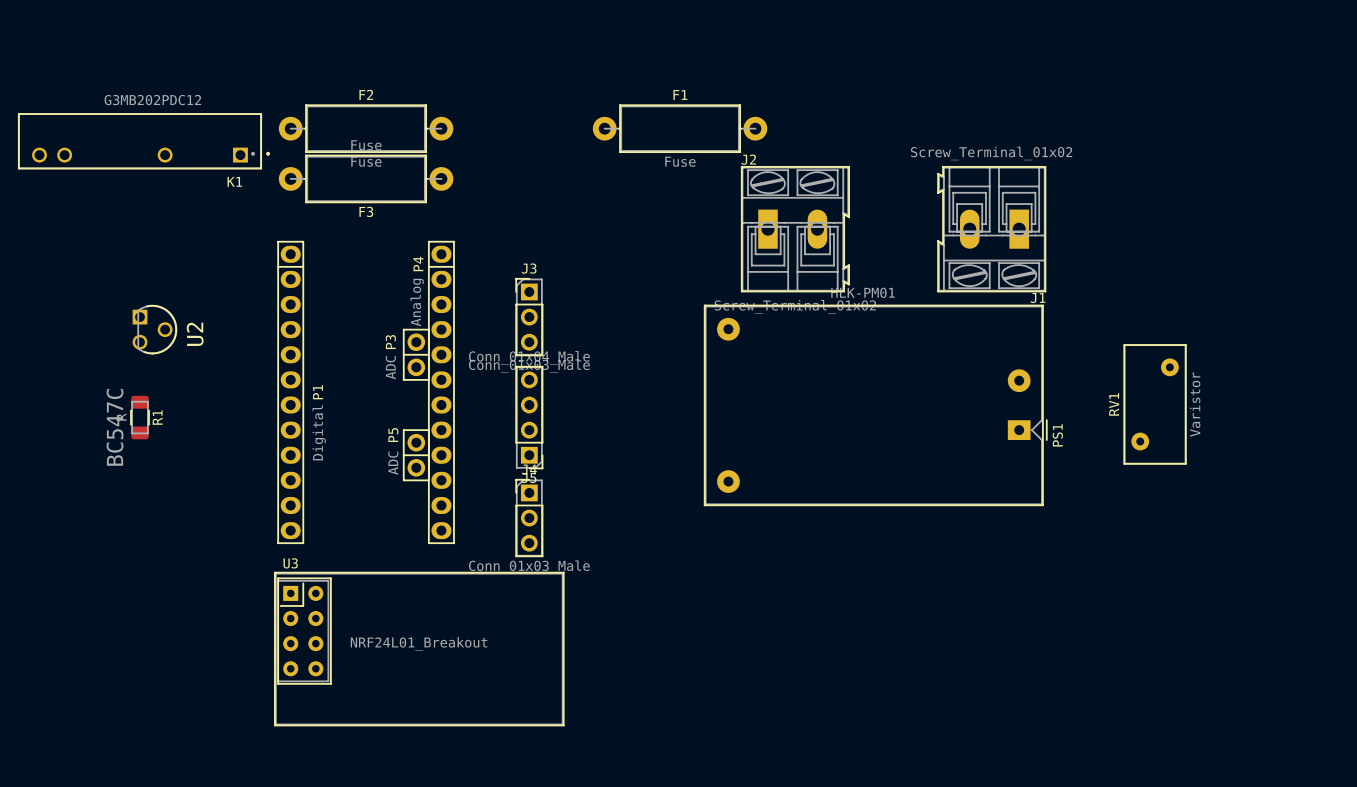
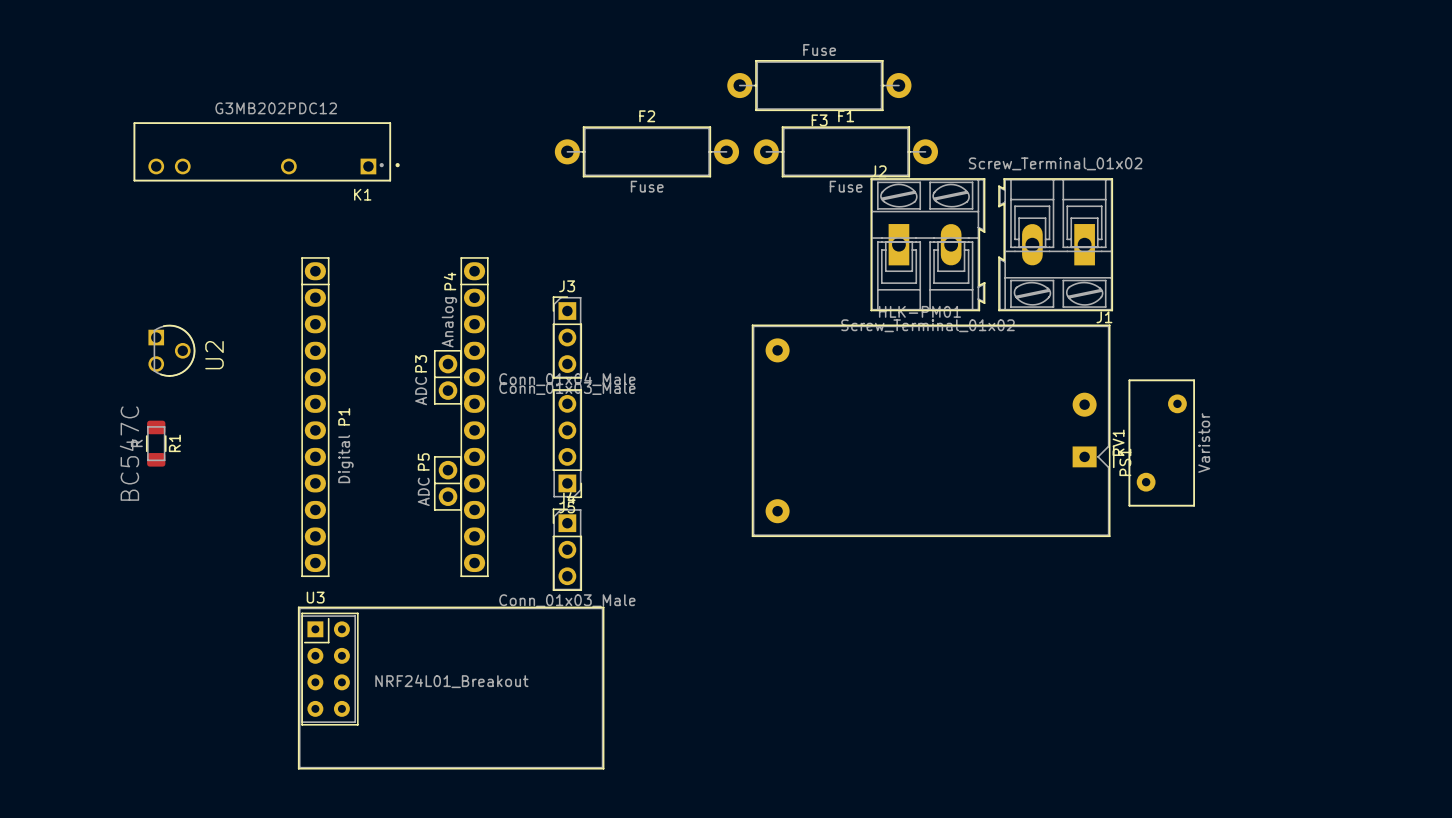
F2 position: (366, 128) -> (646, 151)
F1 position: (680, 128) -> (845, 151)
K1 position: (144, 141) -> (266, 151)
F3 position: (366, 178) -> (819, 85)
J2 position: (795, 229) -> (927, 244)
RV1 position: (1155, 404) -> (1161, 443)

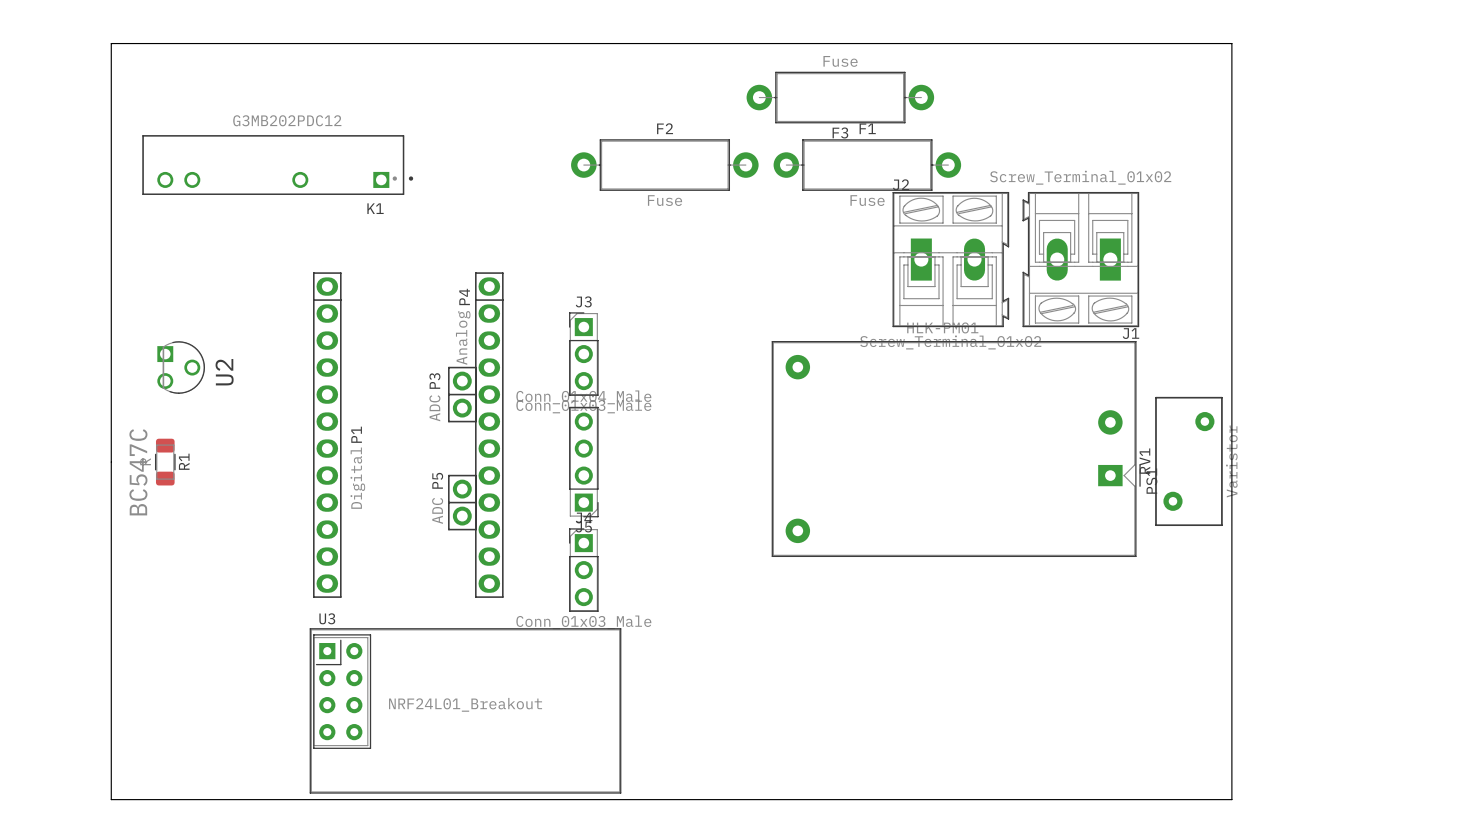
board edge: none -> (111, 43) (111, 799) (1231, 799) (1231, 43) (111, 43)

